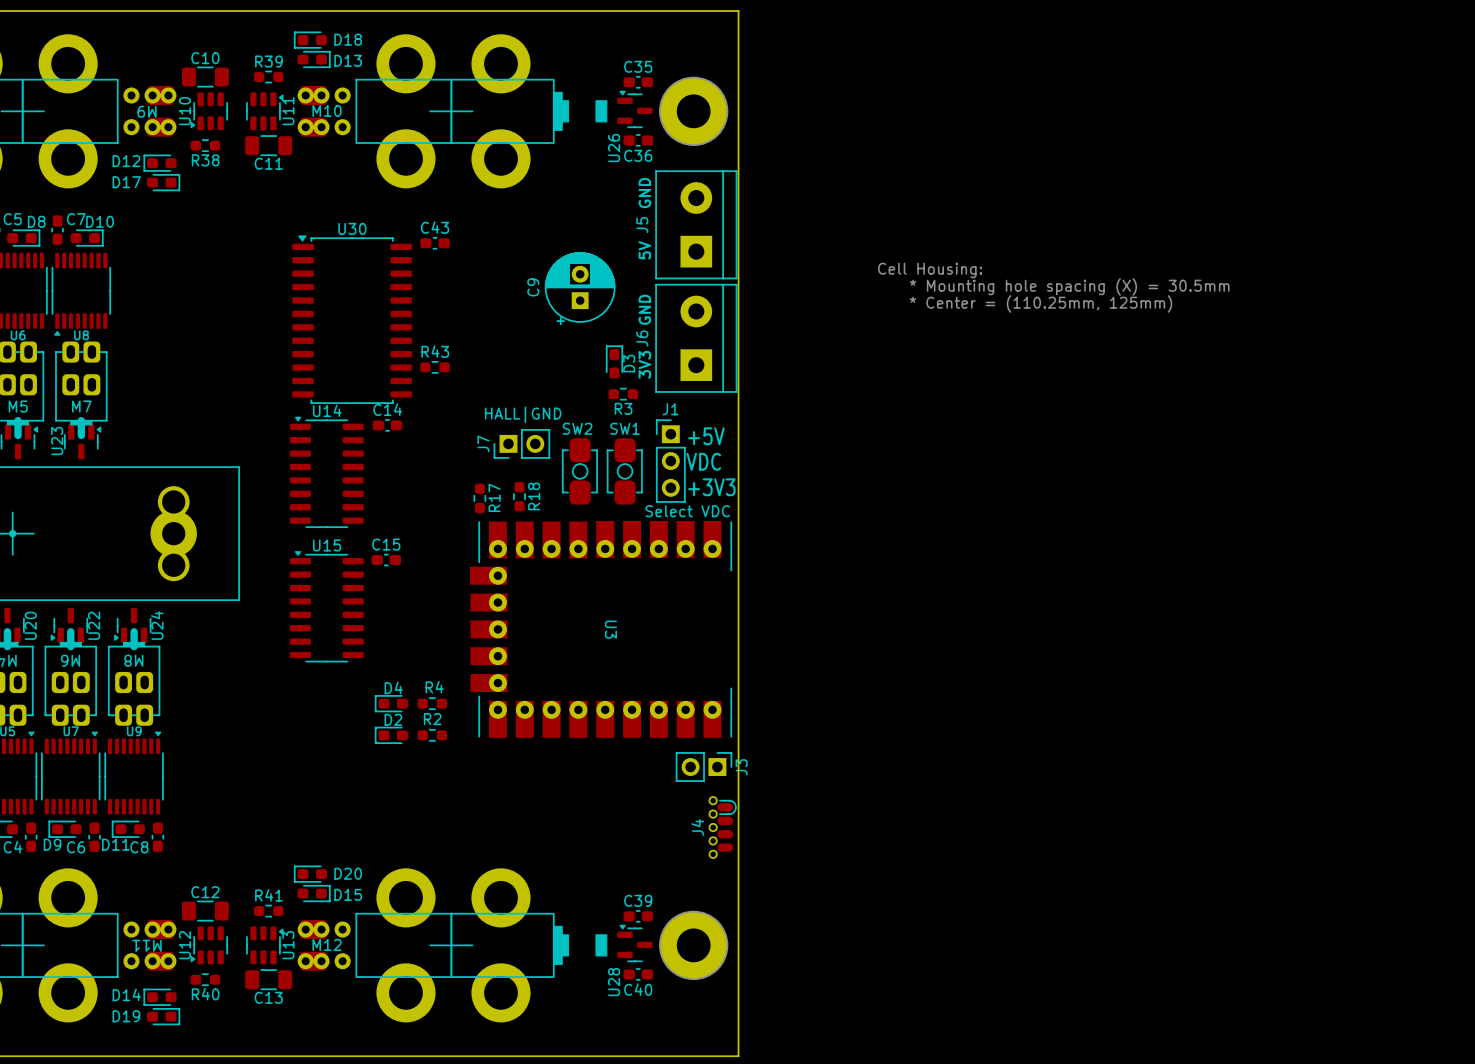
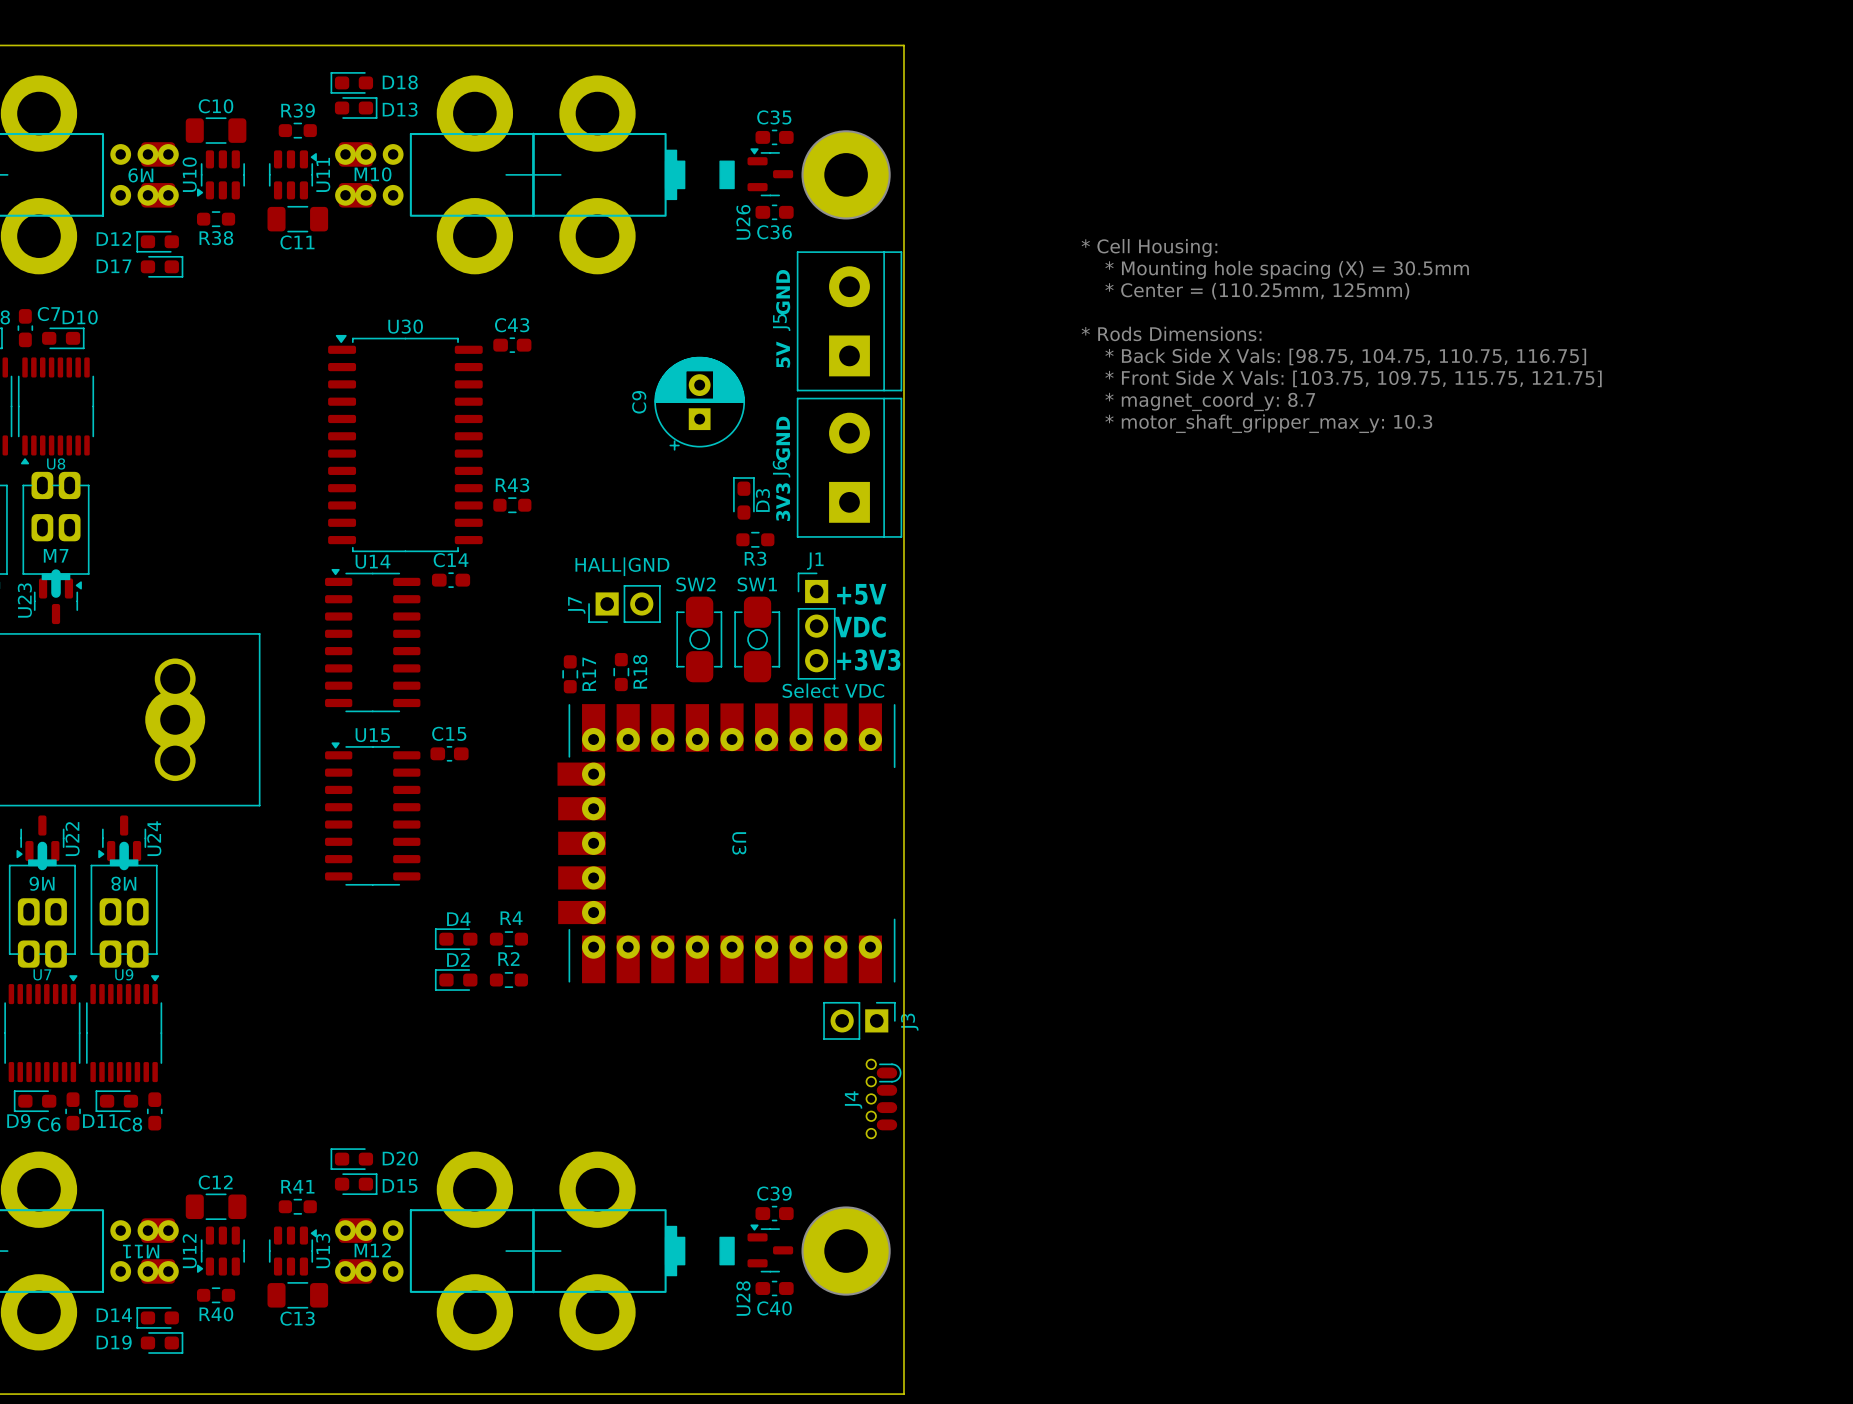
text: none -> * Cell Housing: (1149, 248)
text: none -> * Mounting hole spacing (X) = 30.5mm (1287, 269)
text: none -> * Center = (110.25mm, 125mm) (1257, 291)
text: none -> * Rods Dimensions: (1171, 333)
text: none -> * Back Side X Vals: [98.75, 104.75, 110.75, 116.75] (1345, 356)
text: Cell Housing: (930, 270) -> * Front Side X Vals: [103.75, 109.75, 115.75, 121.75] (1353, 378)
text: * Mounting hole spacing (X) = 30.5mm (1069, 286) -> * magnet_coord_y: 8.7 (1210, 401)
text: * Center = (110.25mm, 125mm) (1040, 303) -> * motor_shaft_gripper_max_y: 10.3 (1268, 423)

